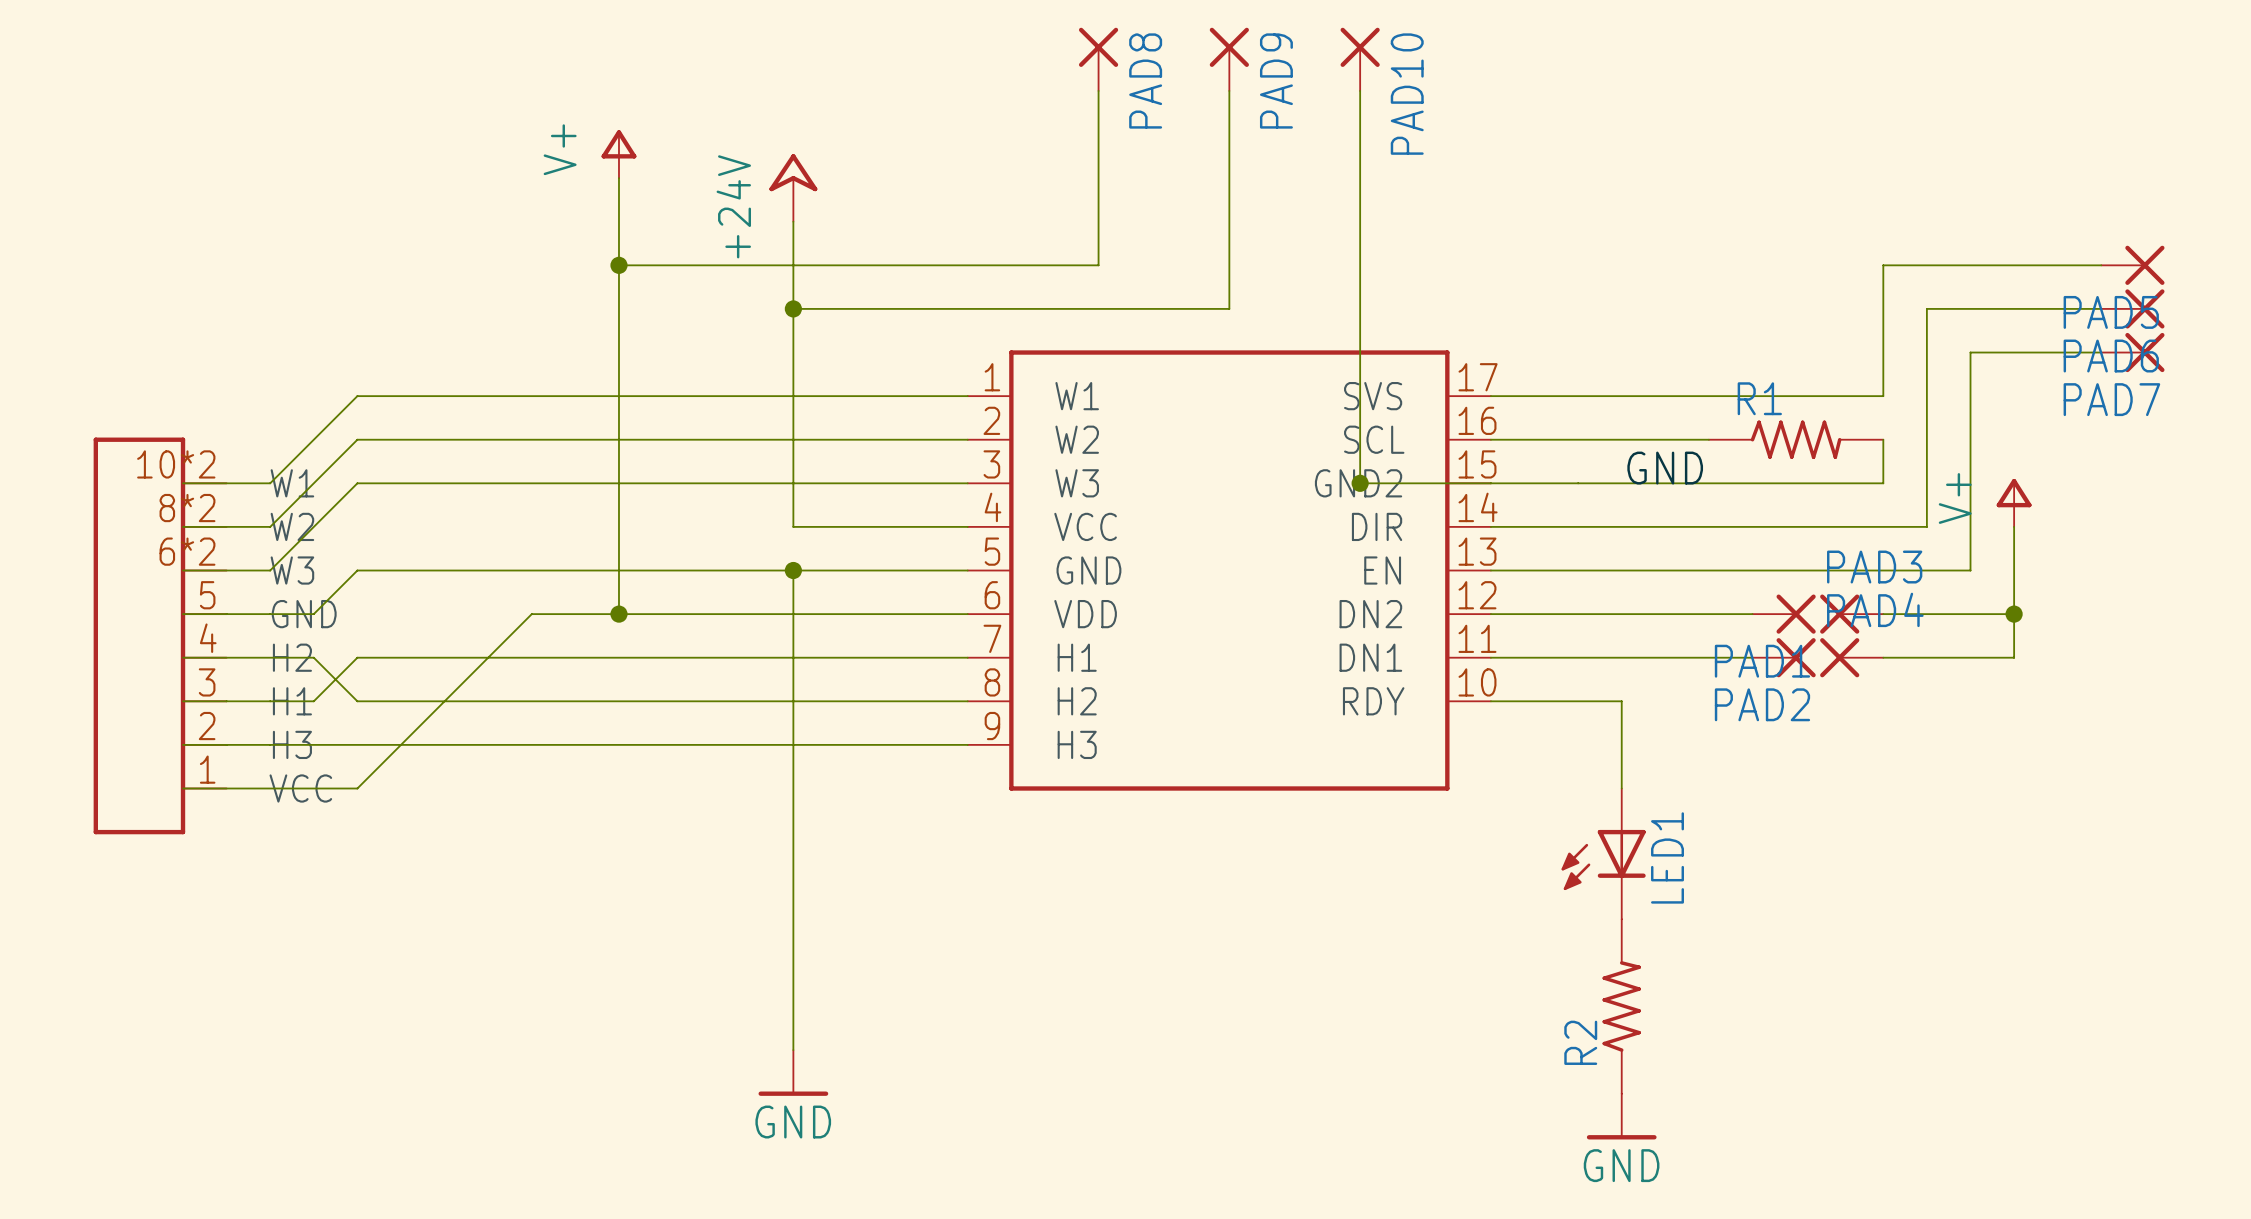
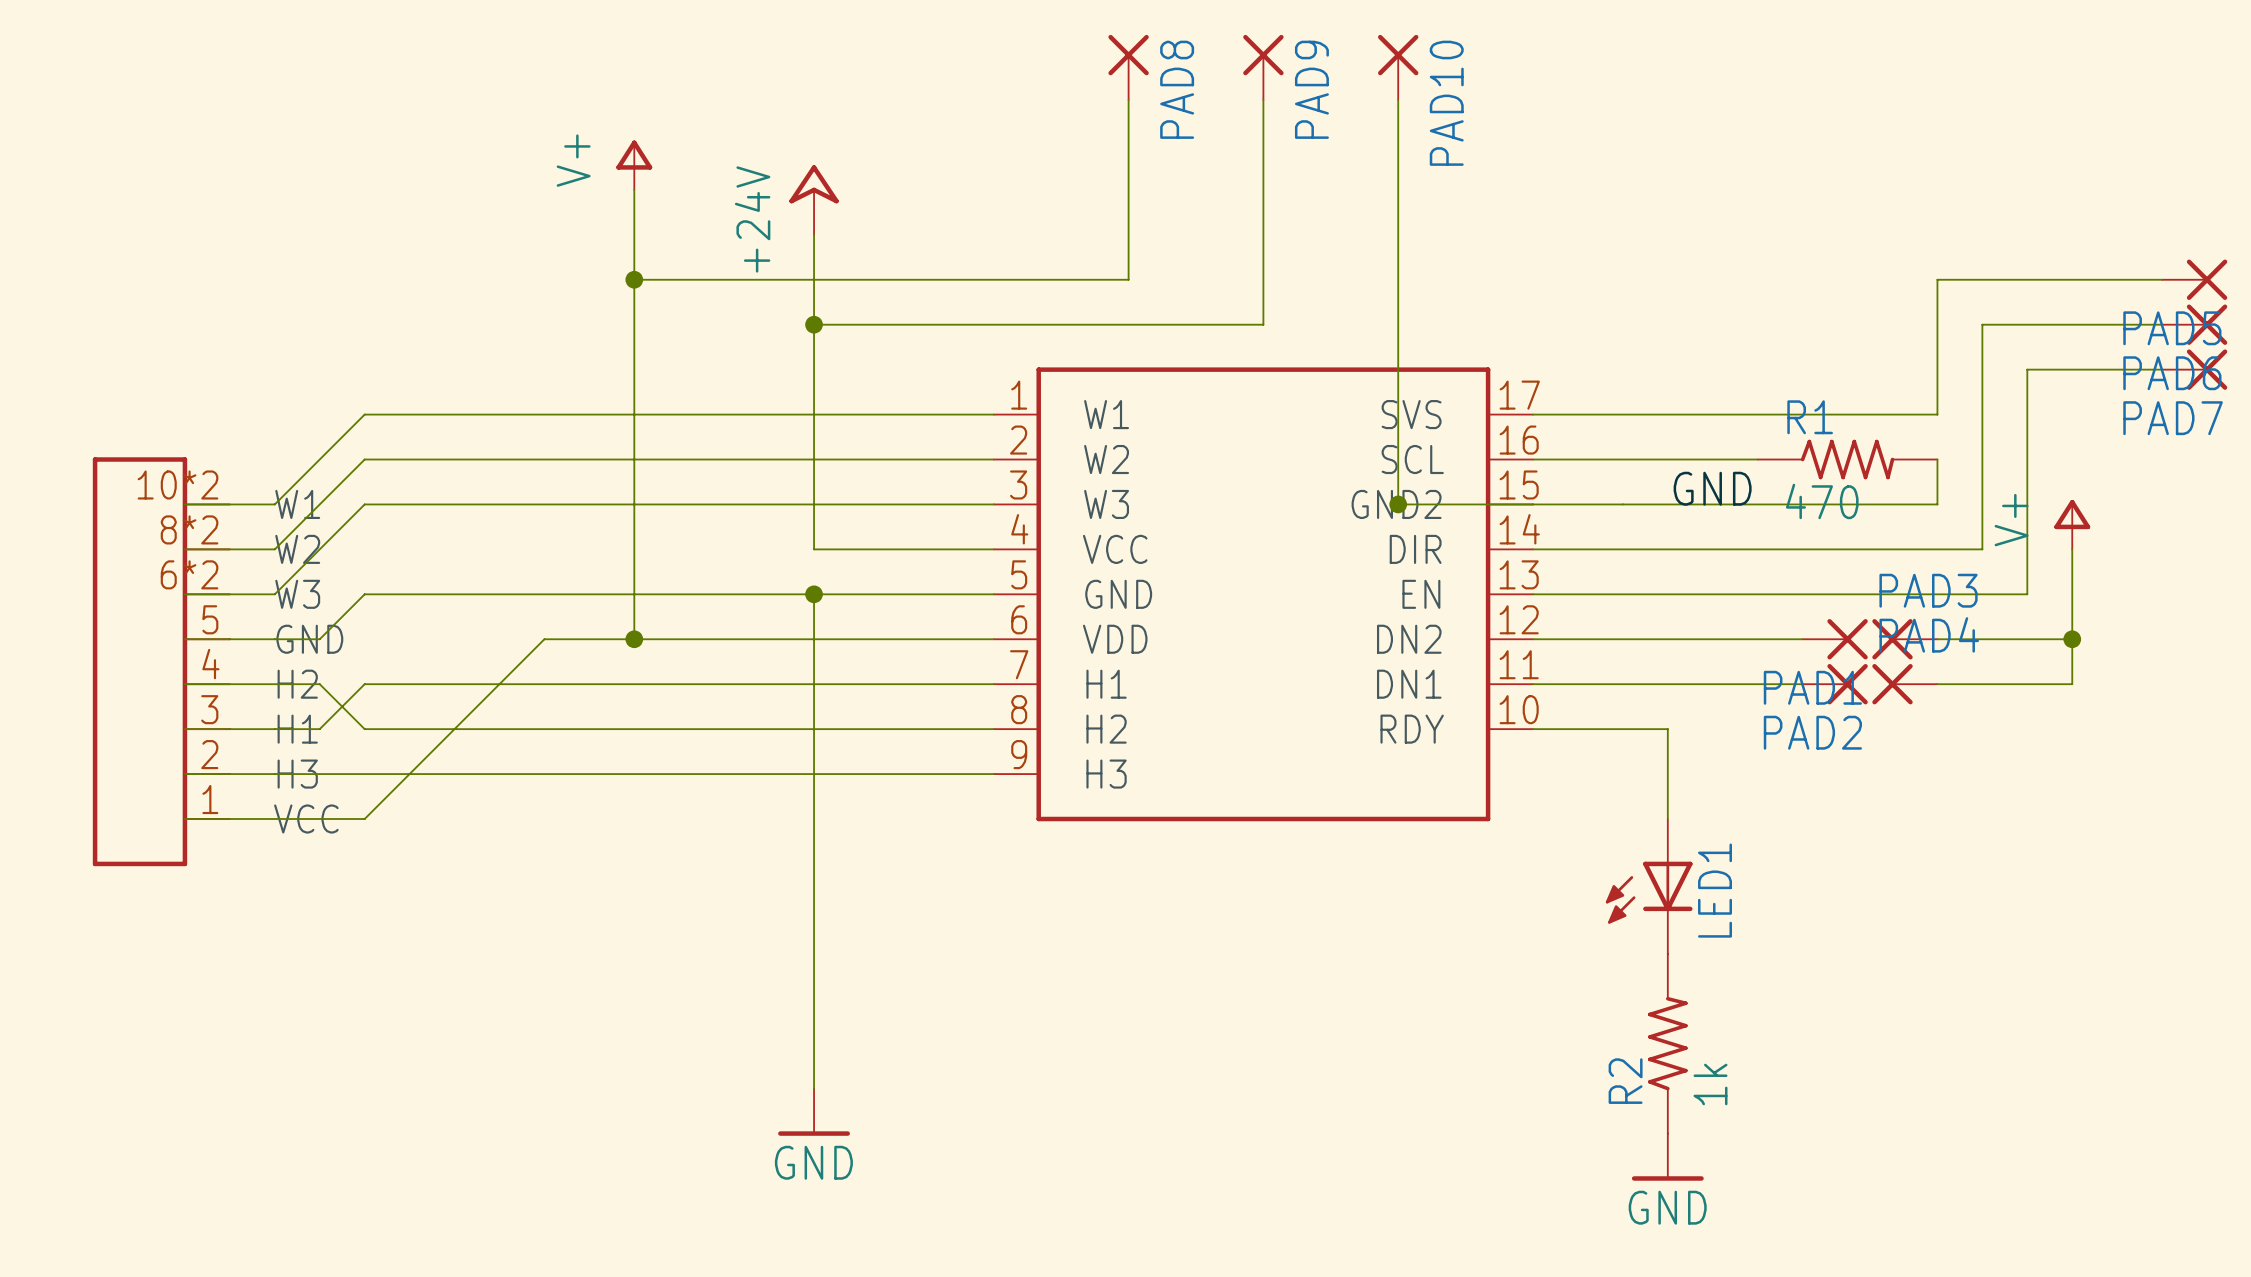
R1 value: none -> 470 (1822, 501)
R2 value: none -> 1k (1710, 1084)

